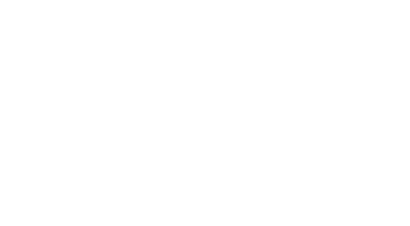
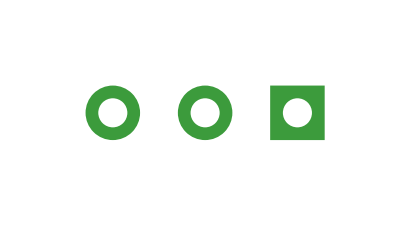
part: none -> (205, 112)

